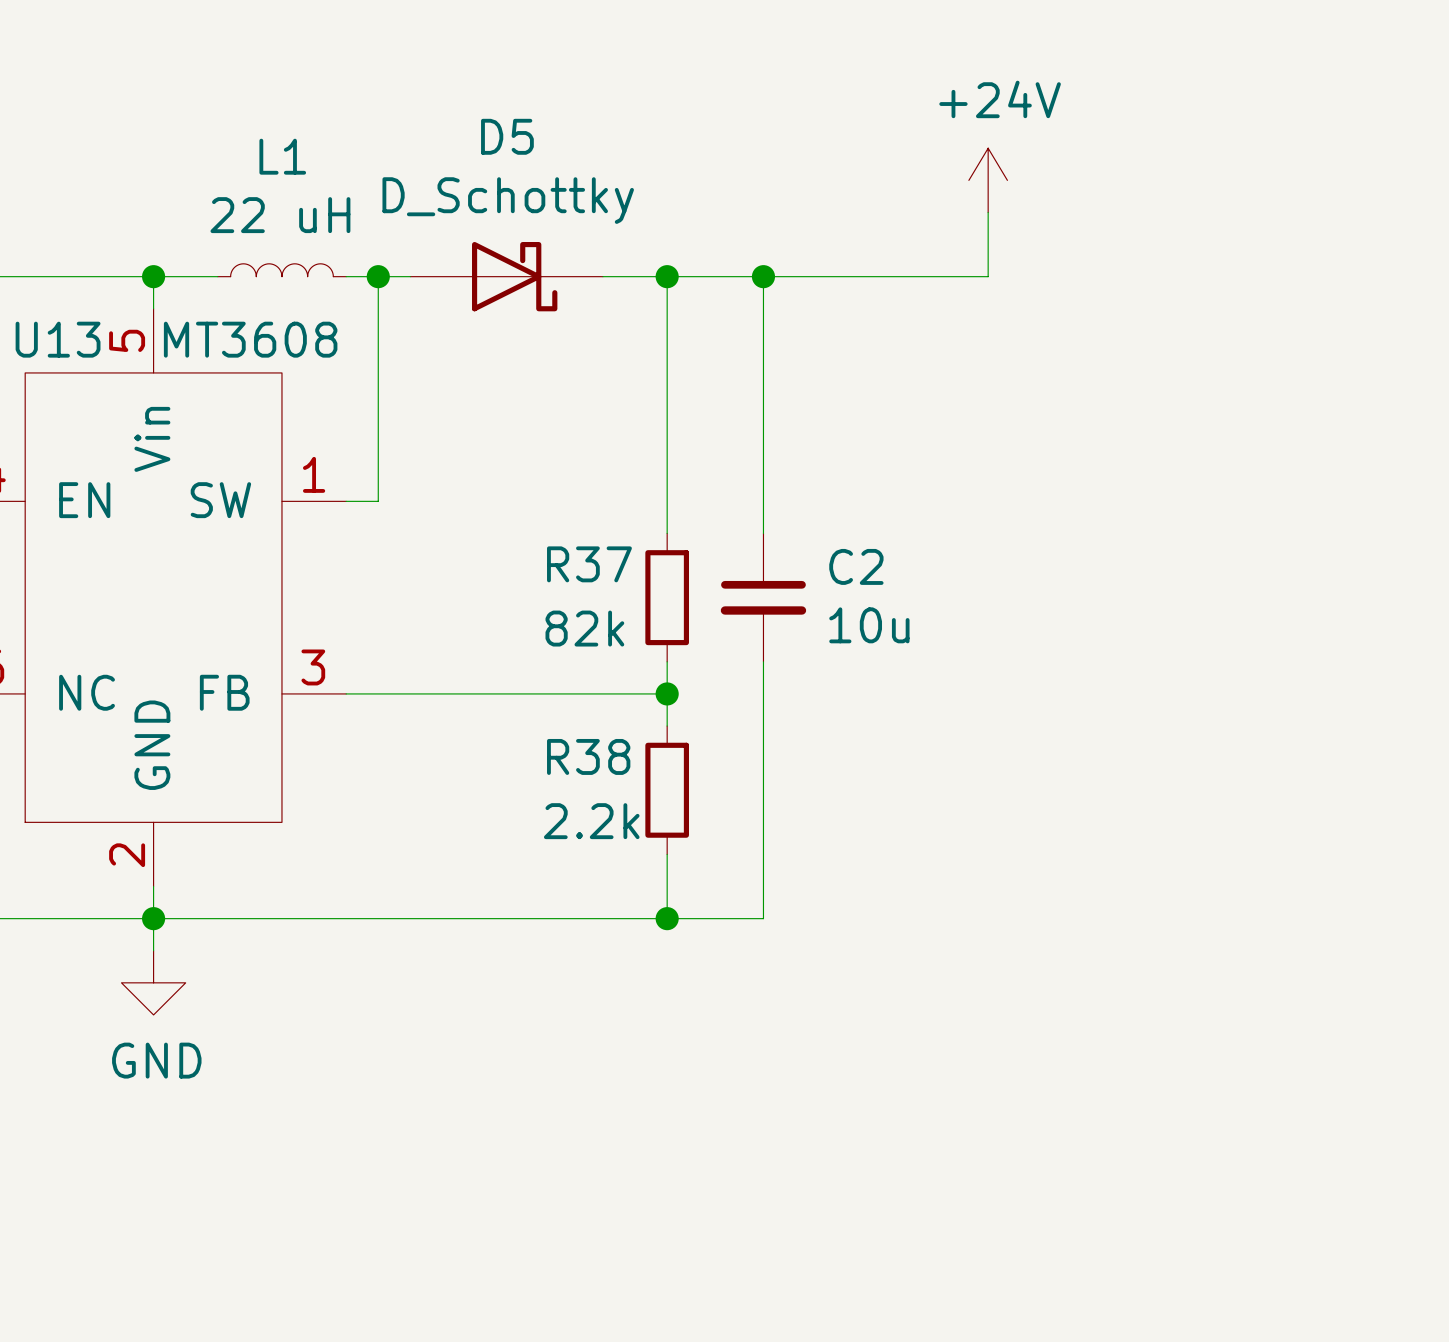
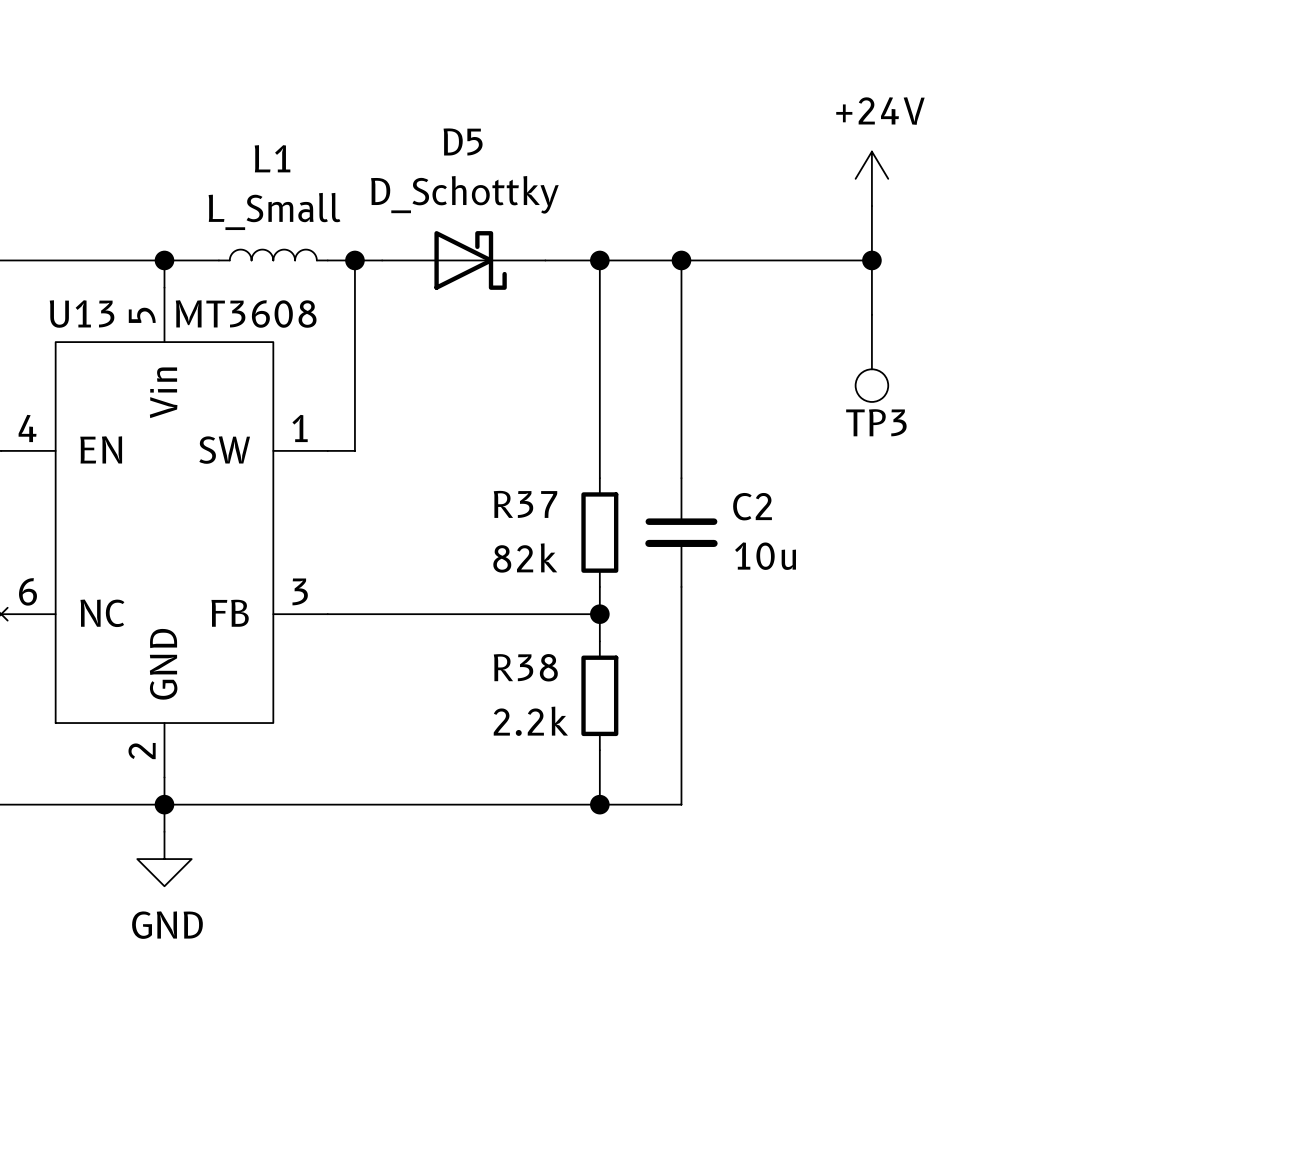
L1 value: 22 uH (280, 215) -> L_Small (274, 211)
wire: none -> (871, 260) (871, 314)
junction: none -> (871, 260)
TP3: none -> (871, 358)

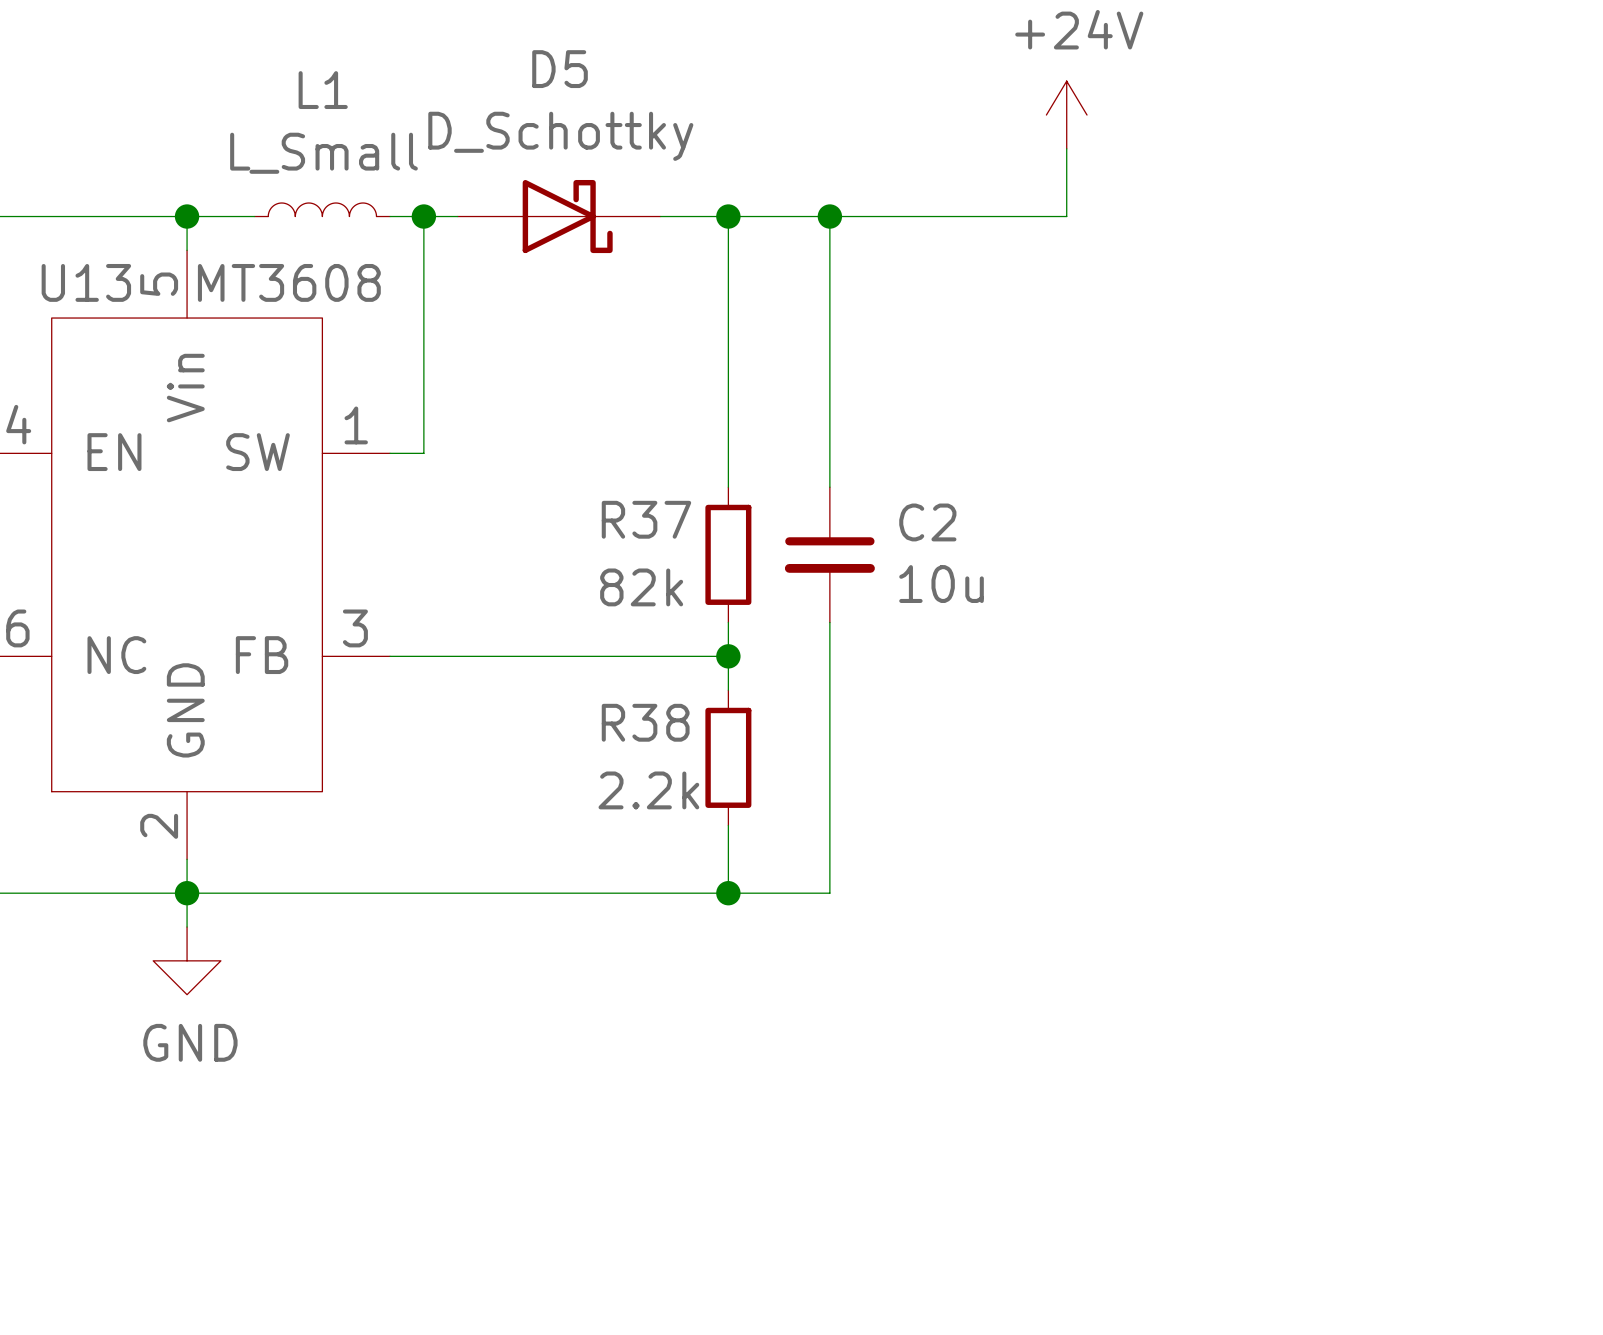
wire: (871, 260) (871, 314) -> none
junction: (871, 260) -> none
TP3: (871, 358) -> none

